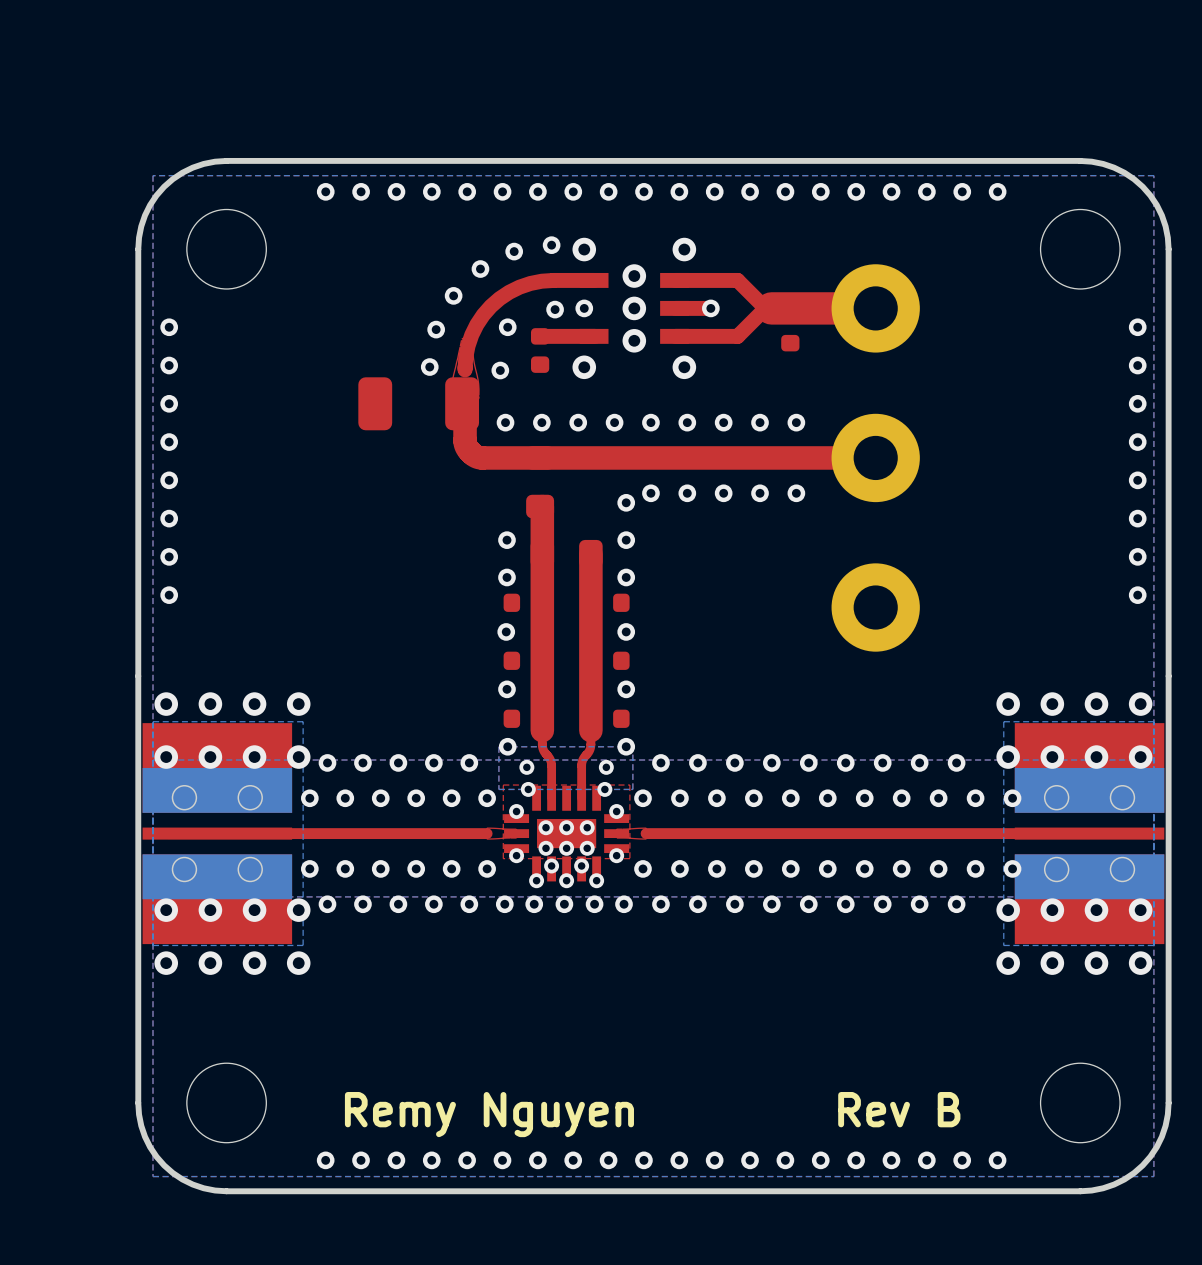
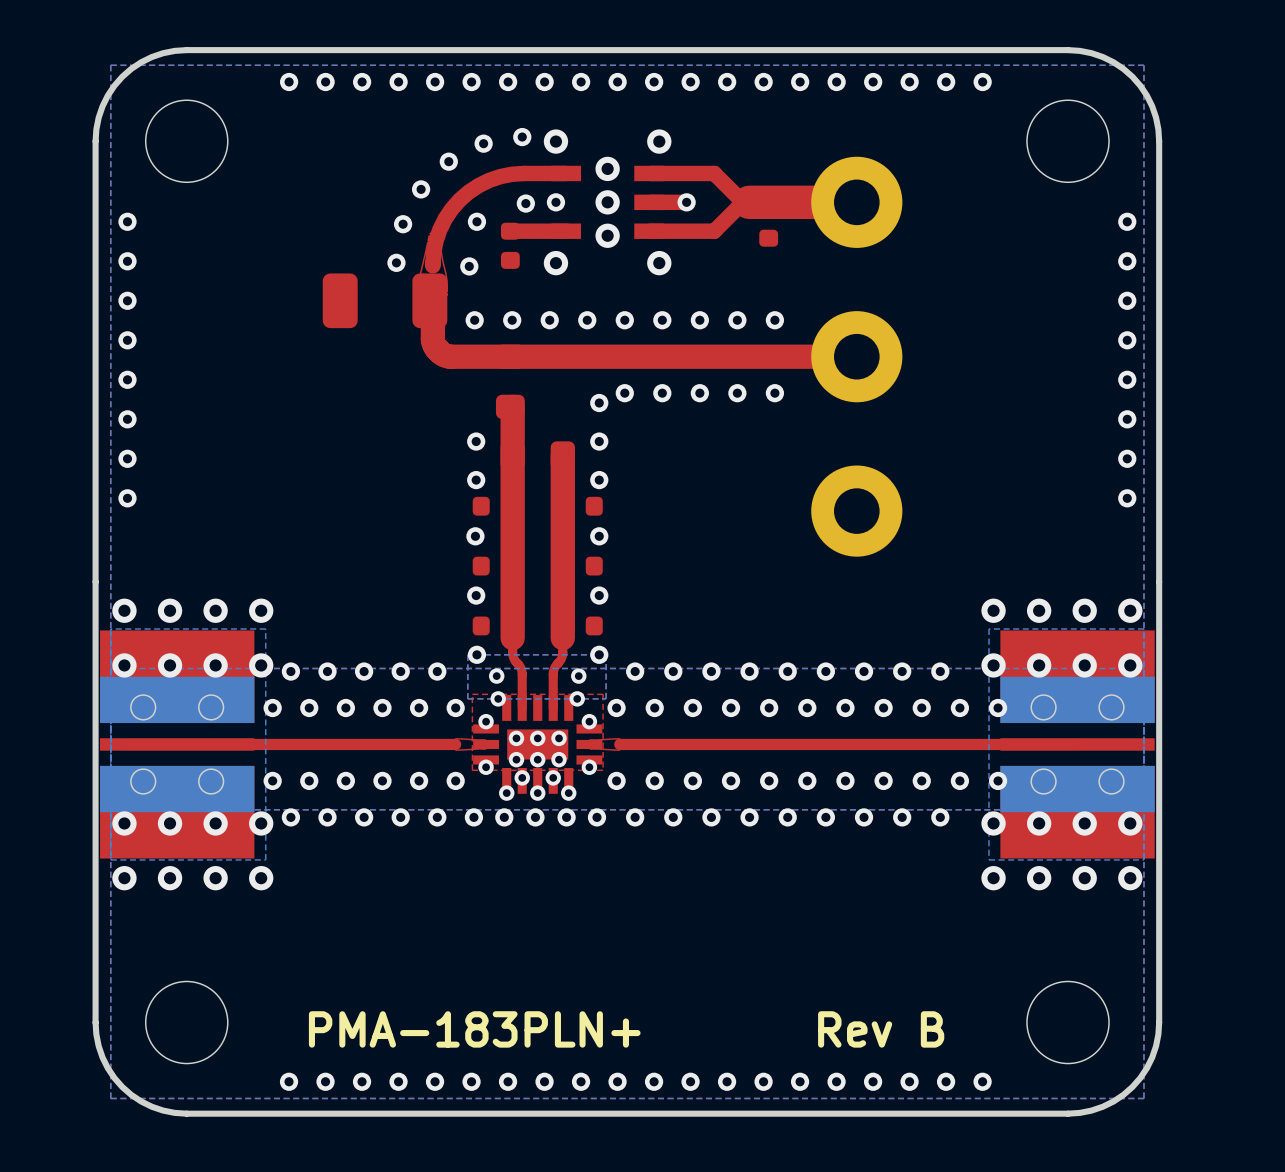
text: Remy Nguyen (489, 1114) -> PMA-183PLN+ (474, 1029)

